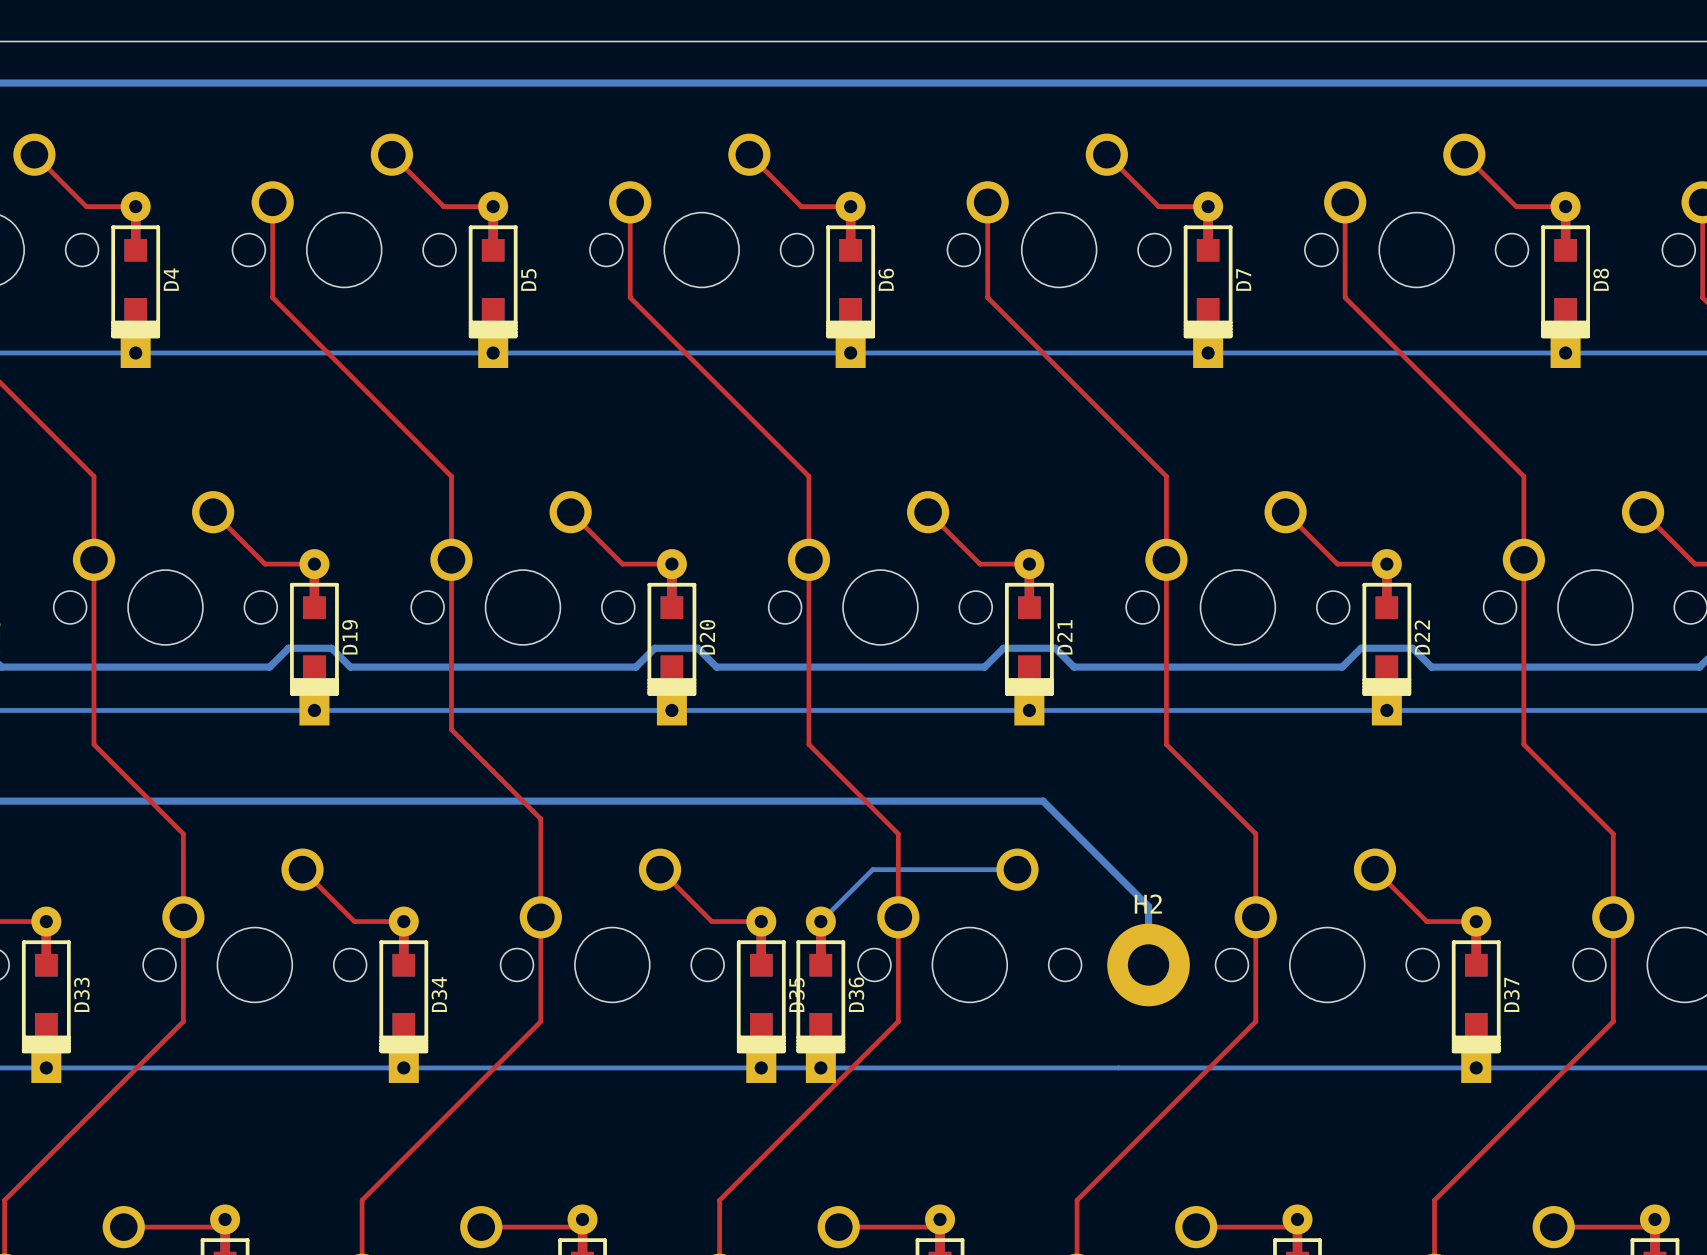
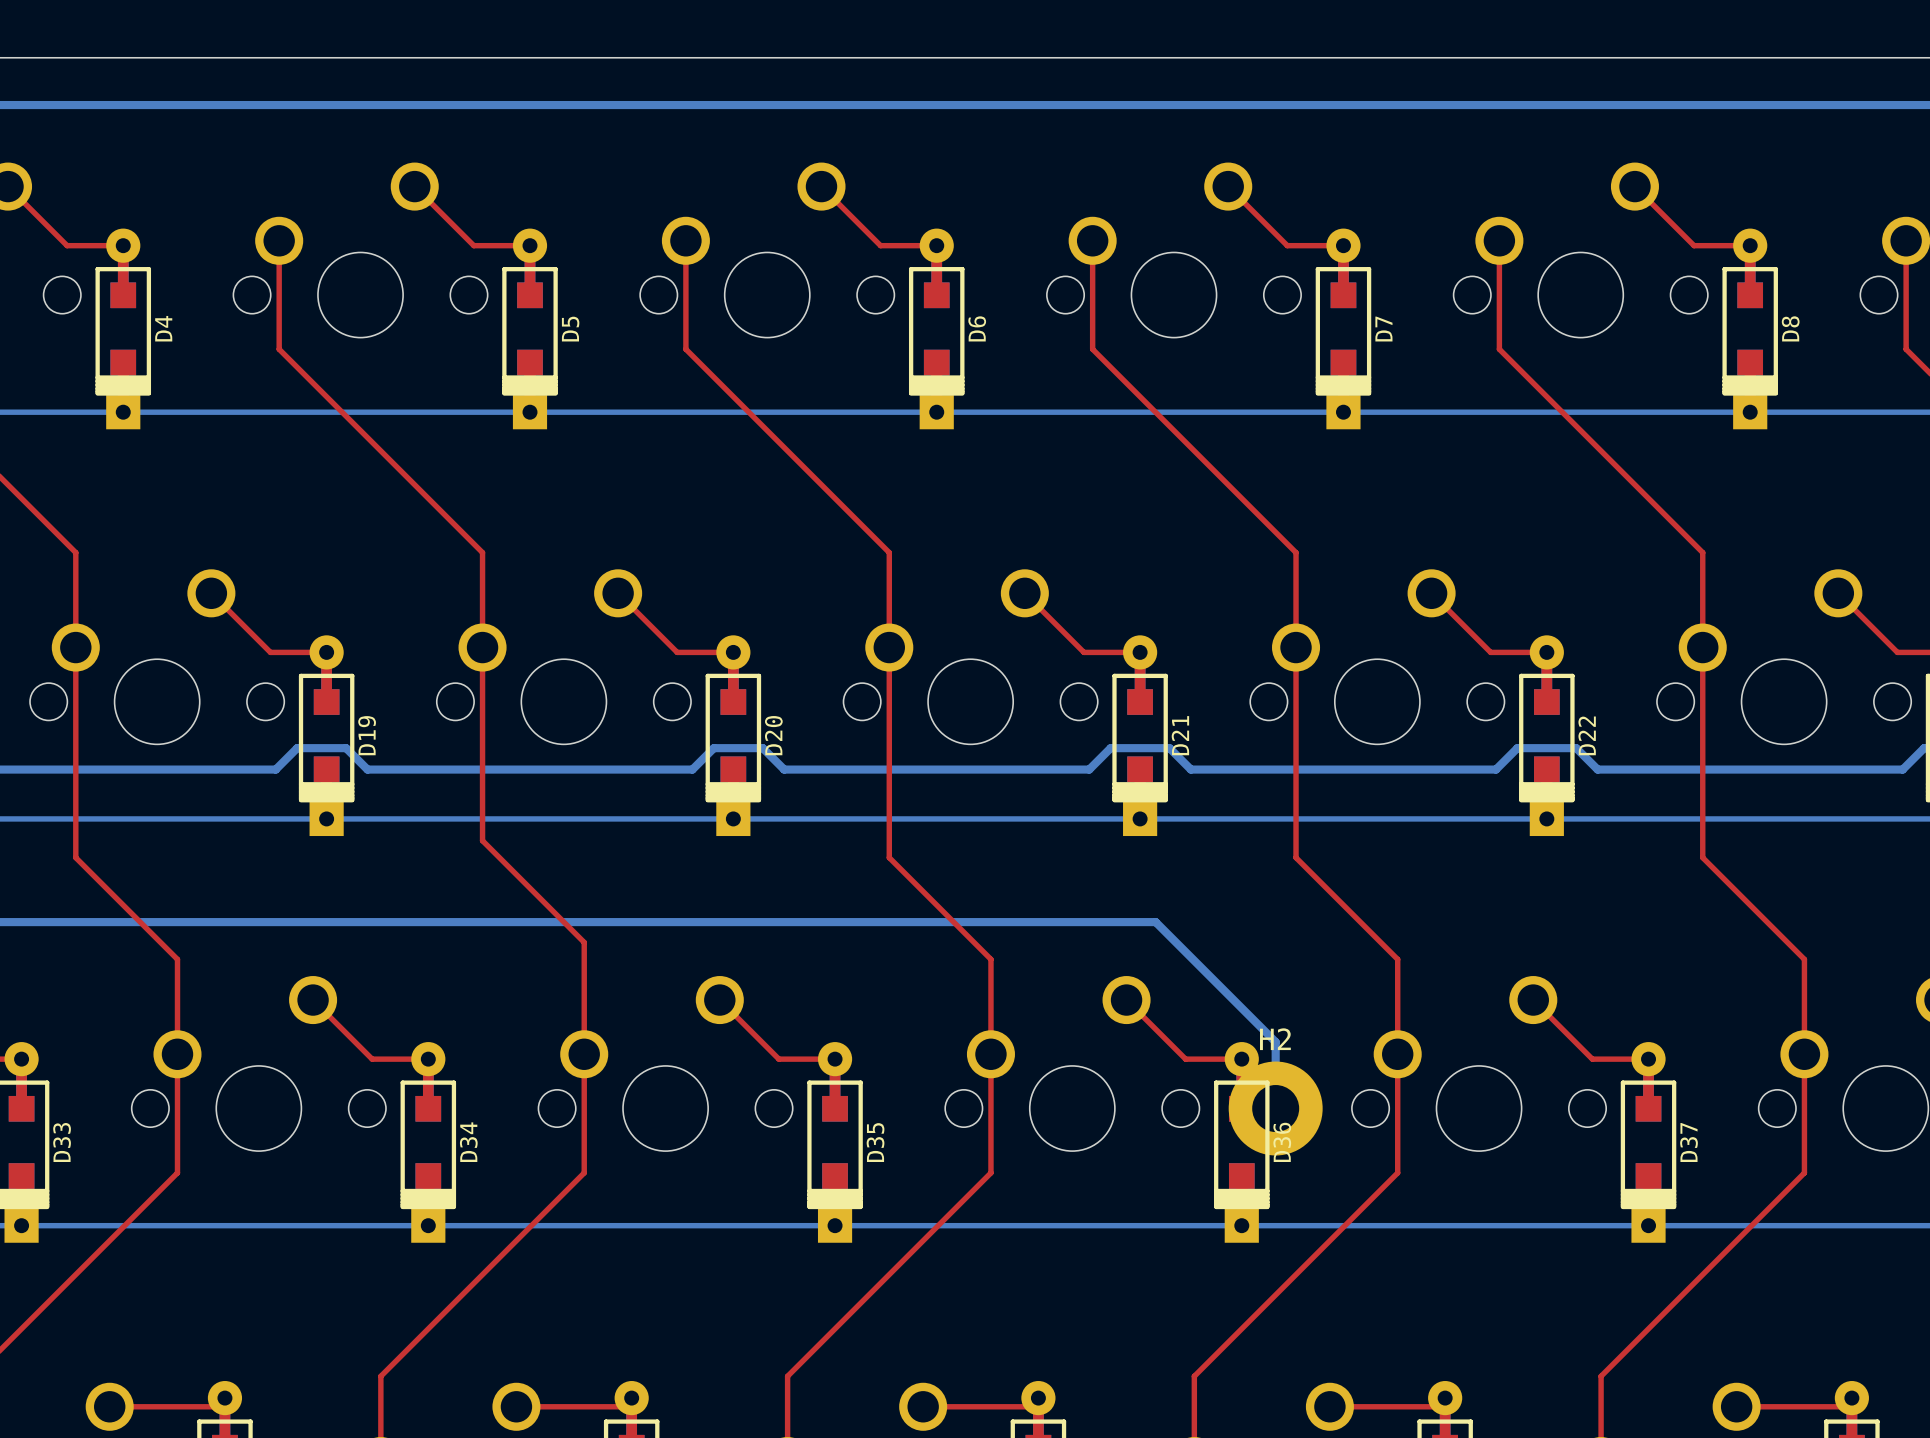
bottom track: (1017, 869) (872, 869) (820, 921) -> none
top track: none -> (1126, 1000) (1185, 1059) (1241, 1059)
D36 position: (820, 994) -> (1241, 1142)

